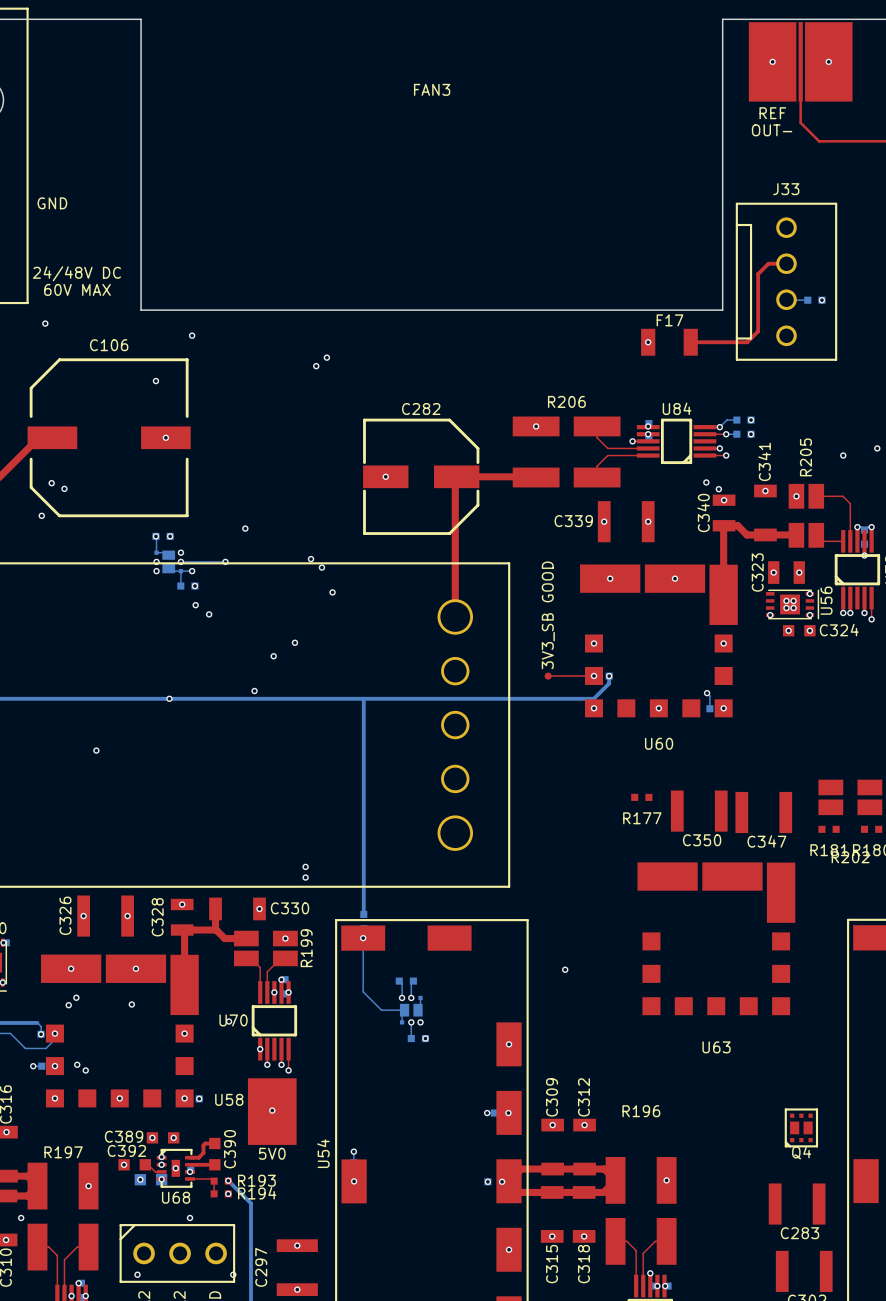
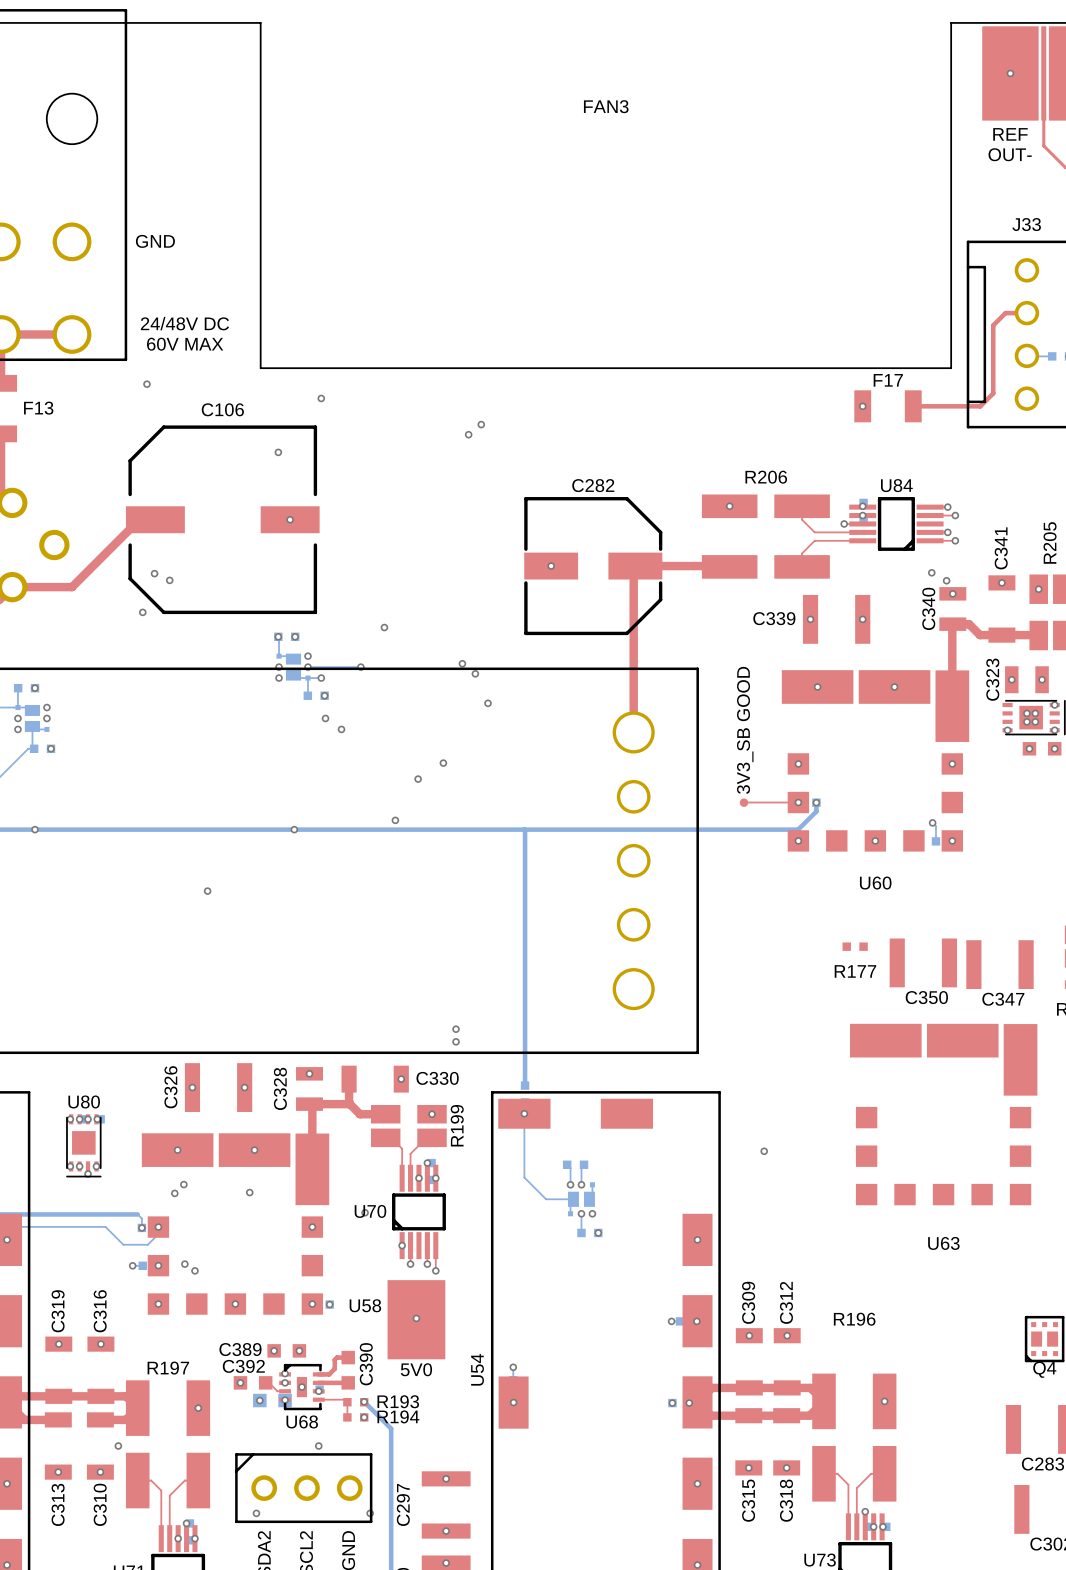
bottom track: (736, 420) (726, 420) (719, 427) -> none
part: (743, 420) -> none
via: (751, 420) -> none
bottom track: (726, 434) (736, 434) -> none
part: (743, 434) -> none
via: (751, 434) -> none

